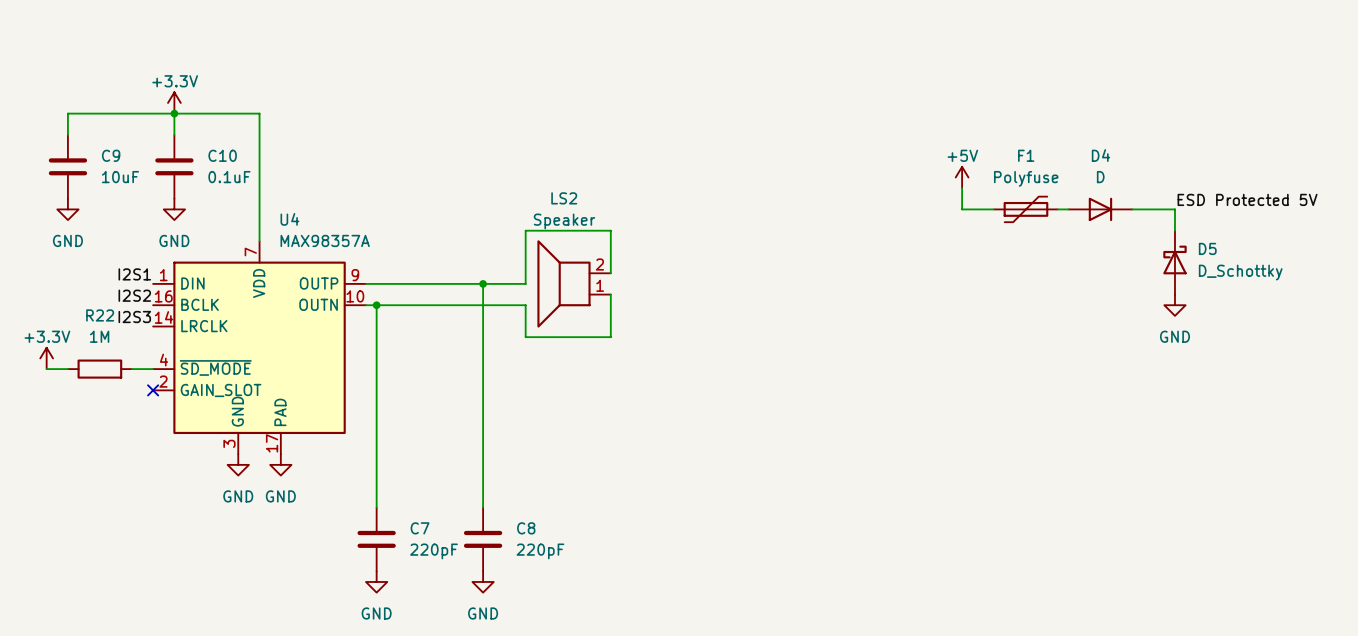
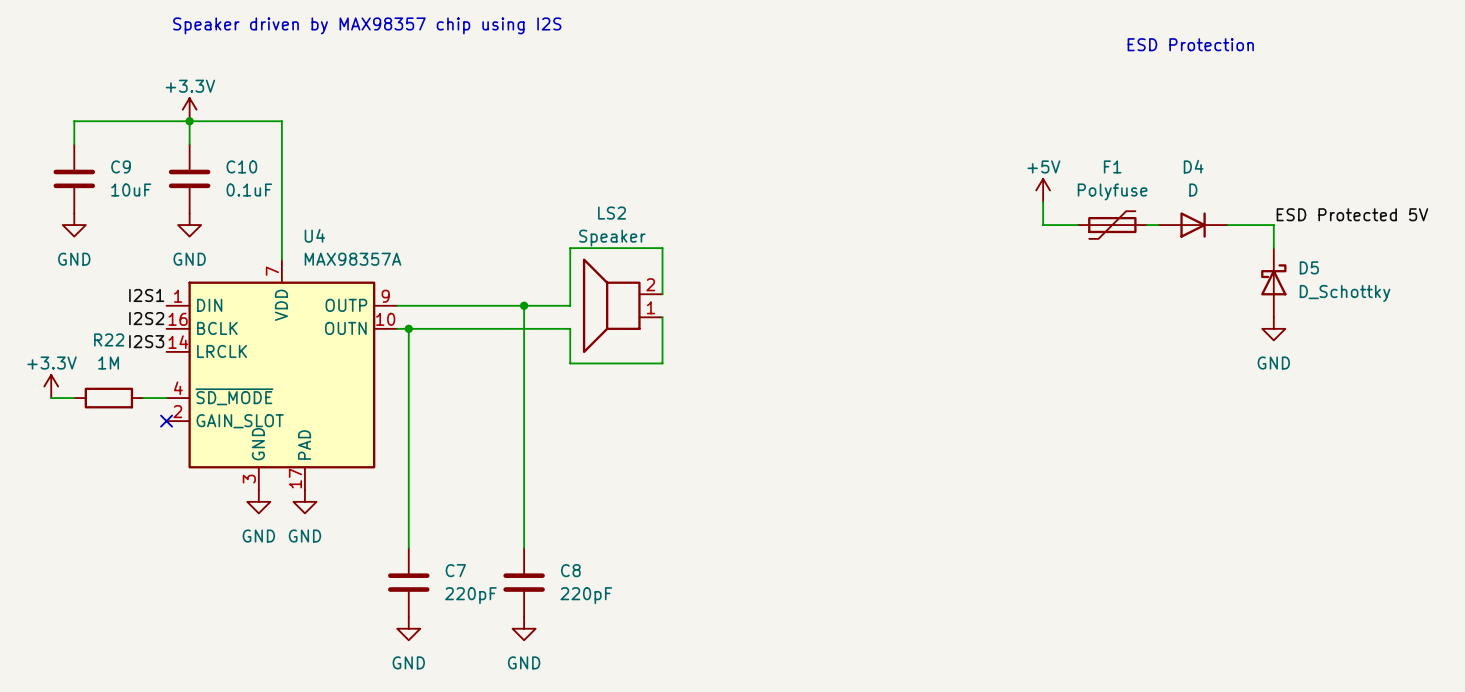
text: none -> Speaker driven by MAX98357 chip using I2S (367, 25)
text: none -> ESD Protection (1190, 44)

